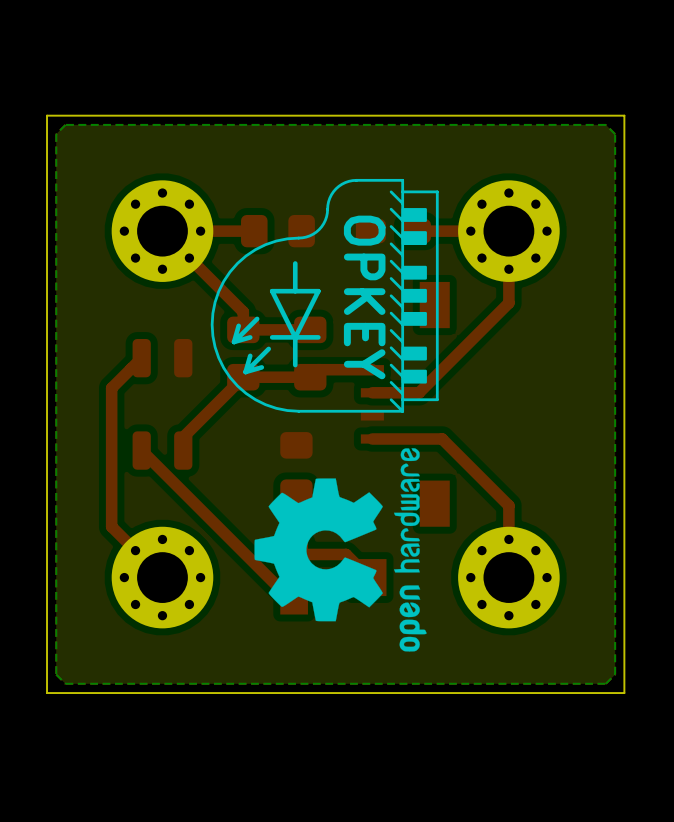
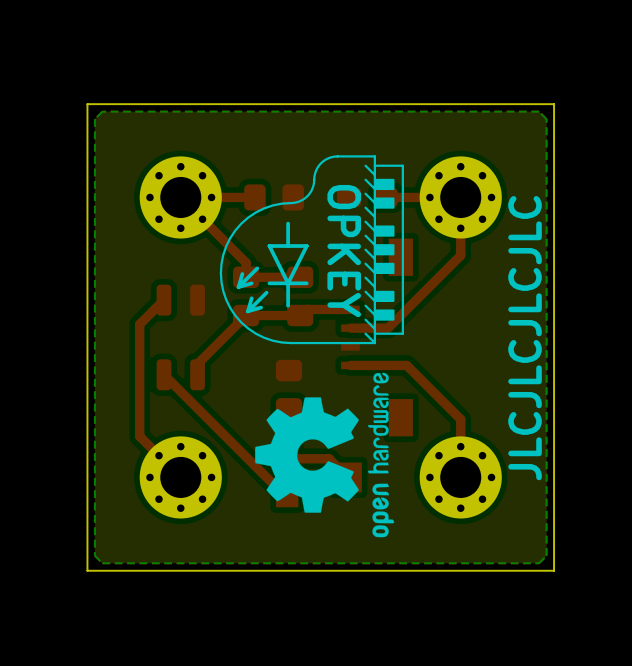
text: none -> JLCJLCJLCJLC (525, 338)

